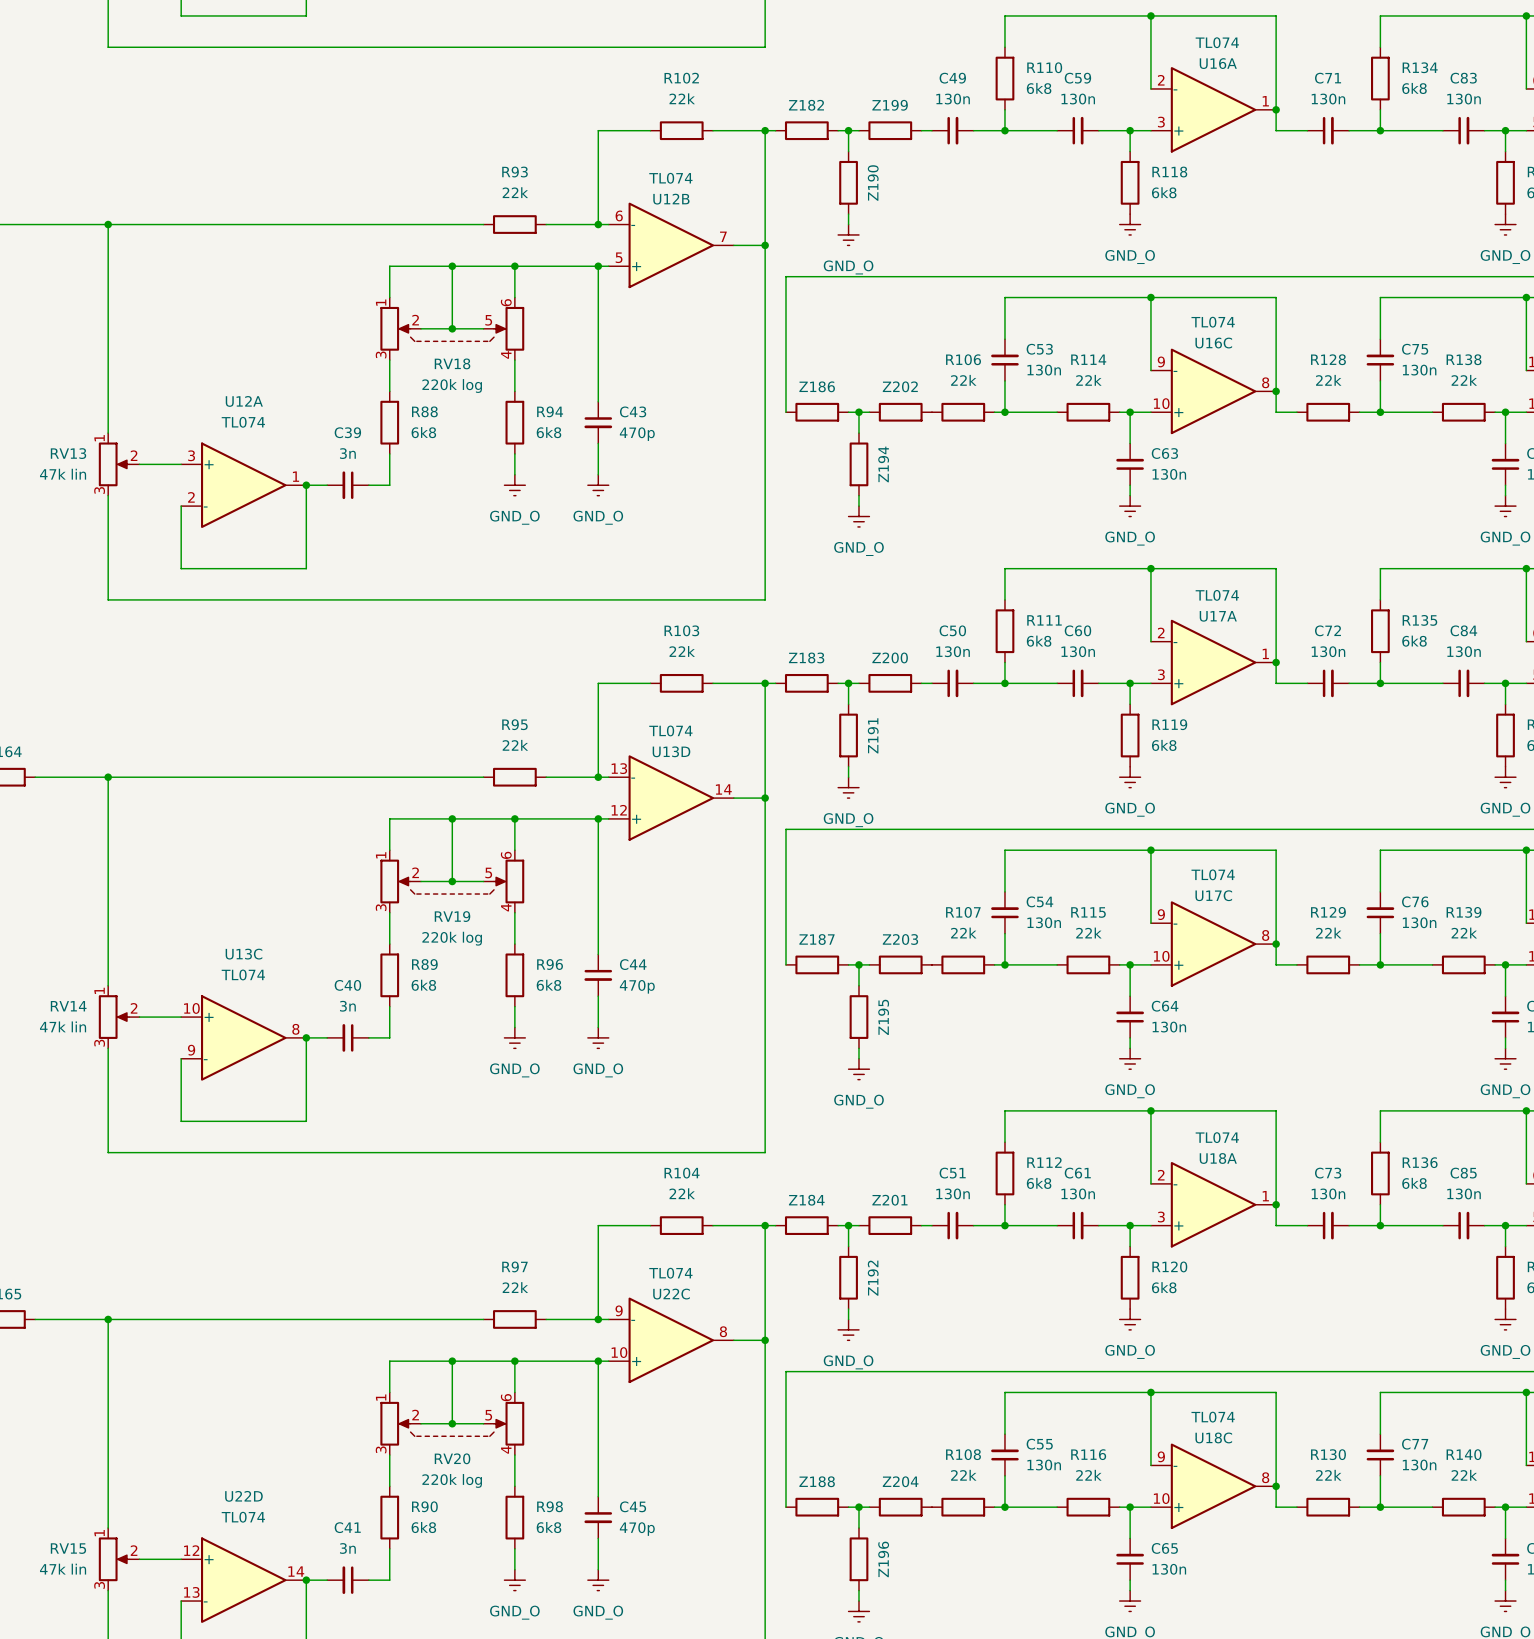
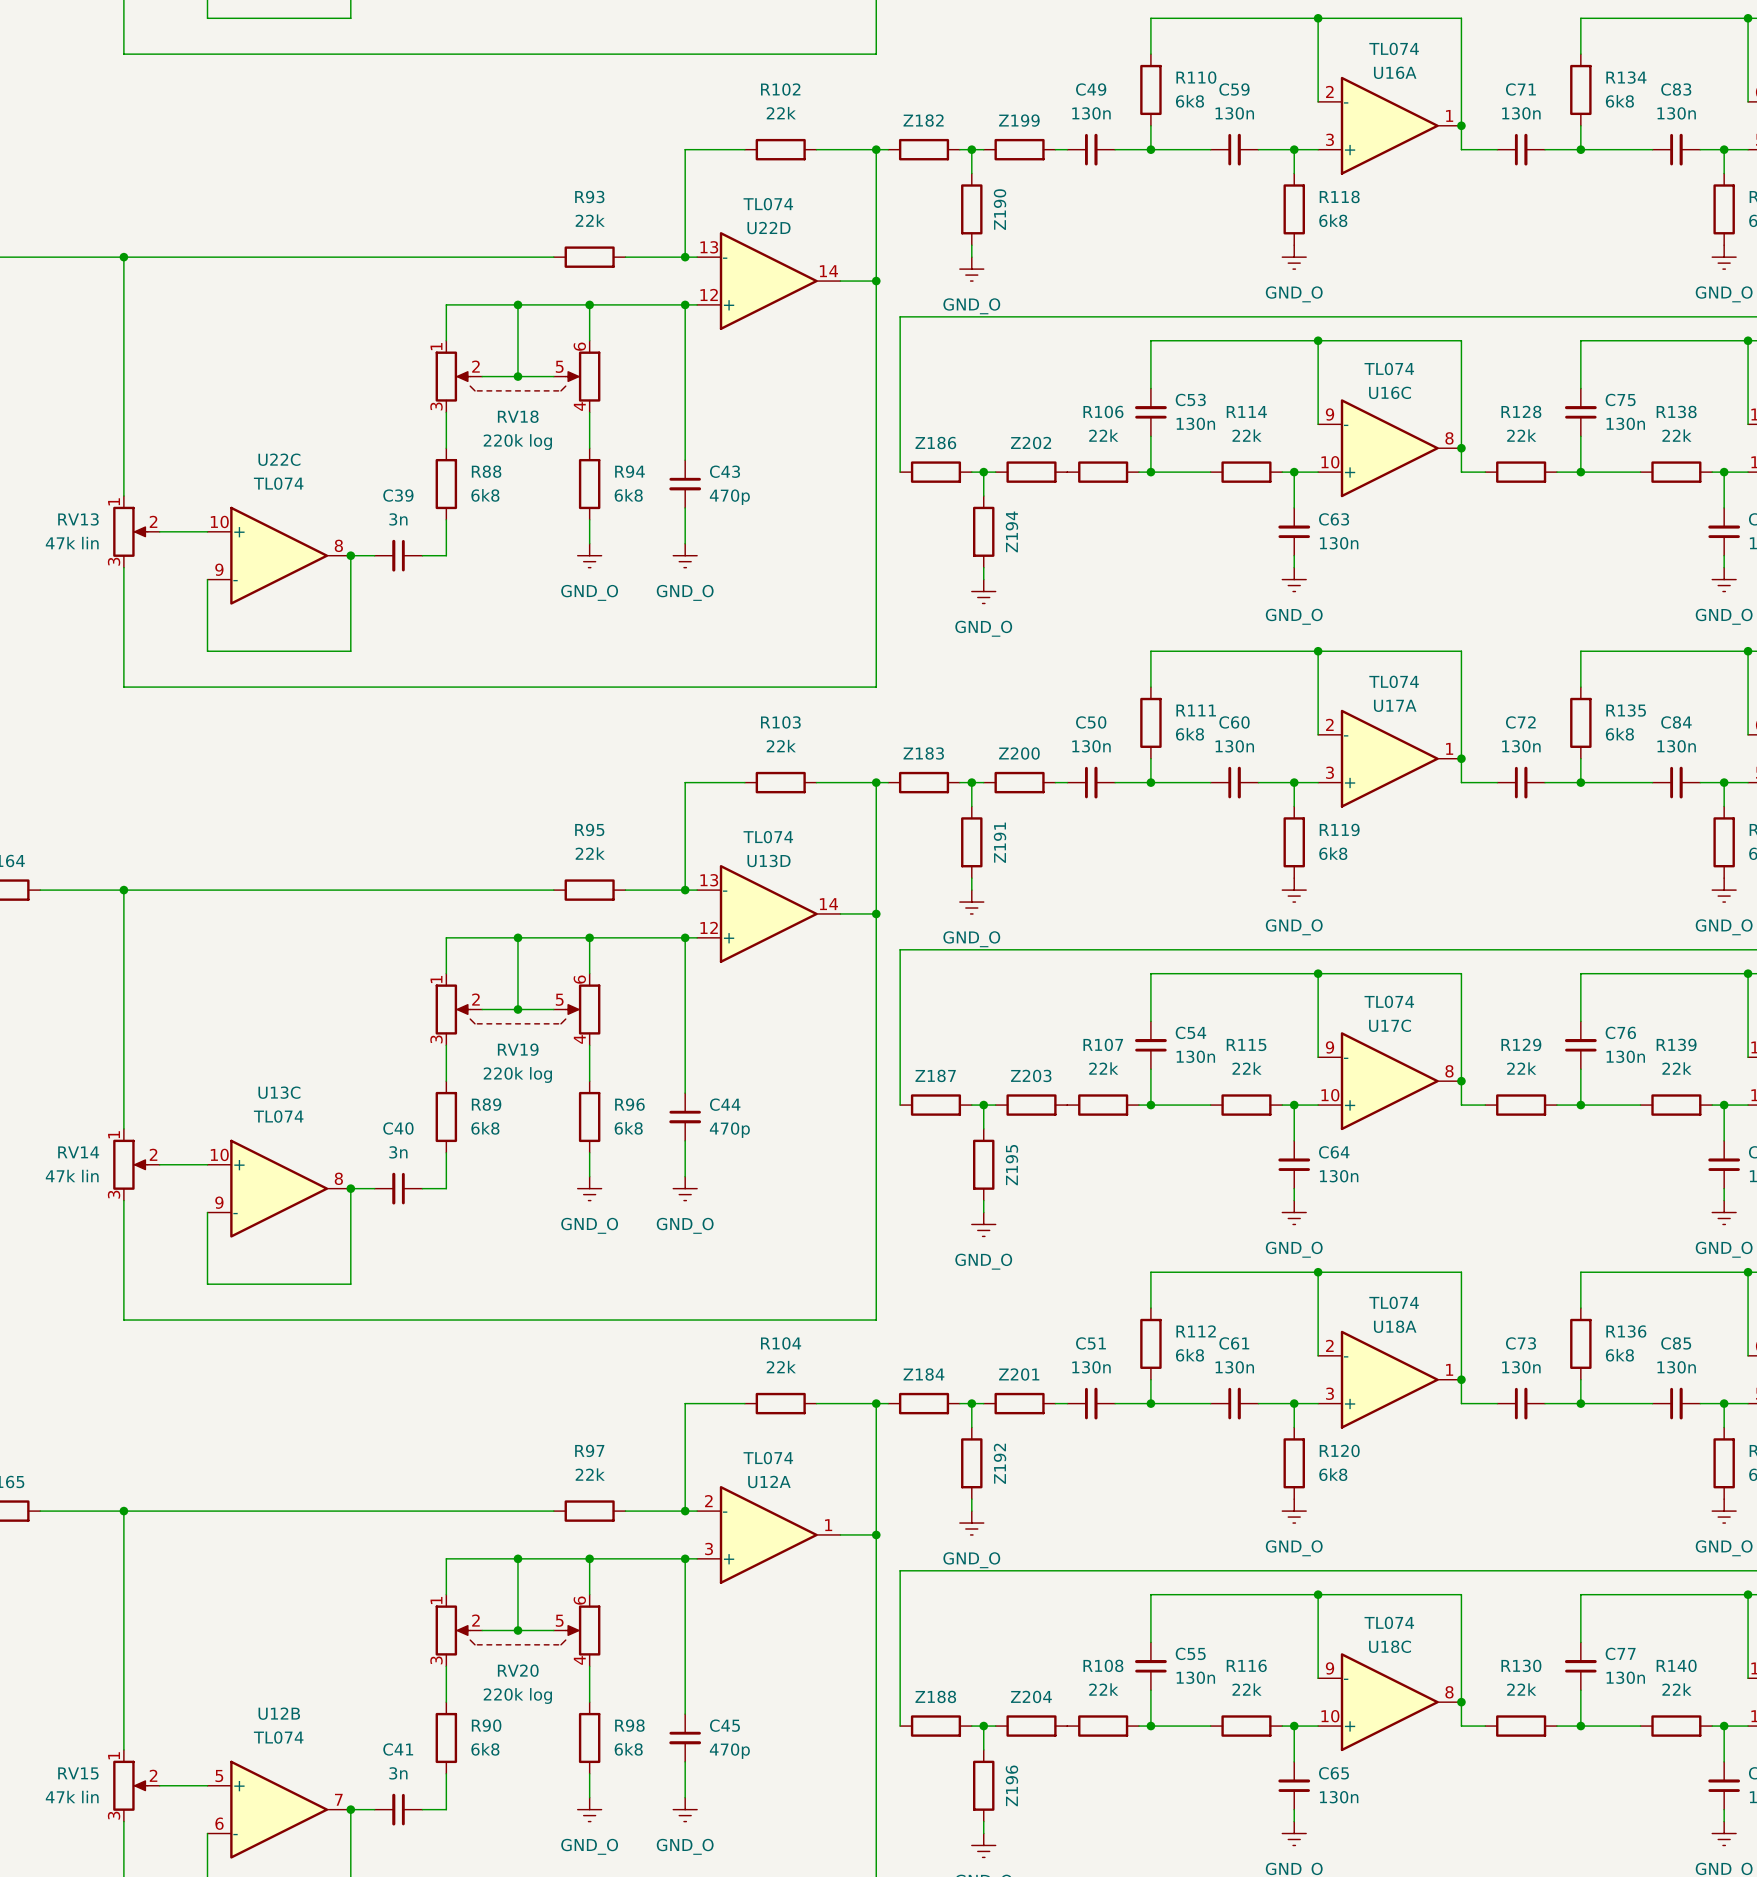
U12B name position: U12B (671, 199) -> U12B (279, 1713)
U12B flip: as is (671, 245) -> up-down (279, 1809)
U12B position: (671, 245) -> (279, 1809)
U12A name position: U12A (244, 401) -> U12A (769, 1481)
U12A flip: as is (243, 485) -> up-down (768, 1534)
U12A position: (243, 485) -> (768, 1534)
U22C name position: U22C (671, 1294) -> U22C (279, 459)
U22C flip: as is (671, 1340) -> up-down (279, 555)
U22C position: (671, 1340) -> (279, 555)
U22D name position: U22D (243, 1496) -> U22D (769, 228)
U22D flip: as is (243, 1580) -> up-down (768, 281)
U22D position: (243, 1580) -> (768, 281)

